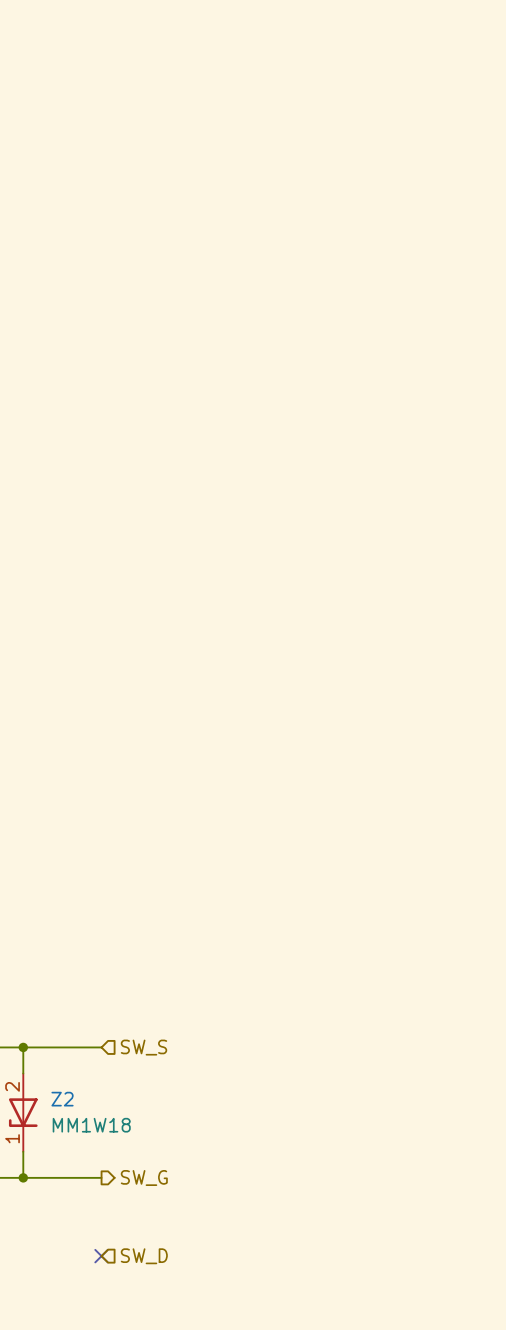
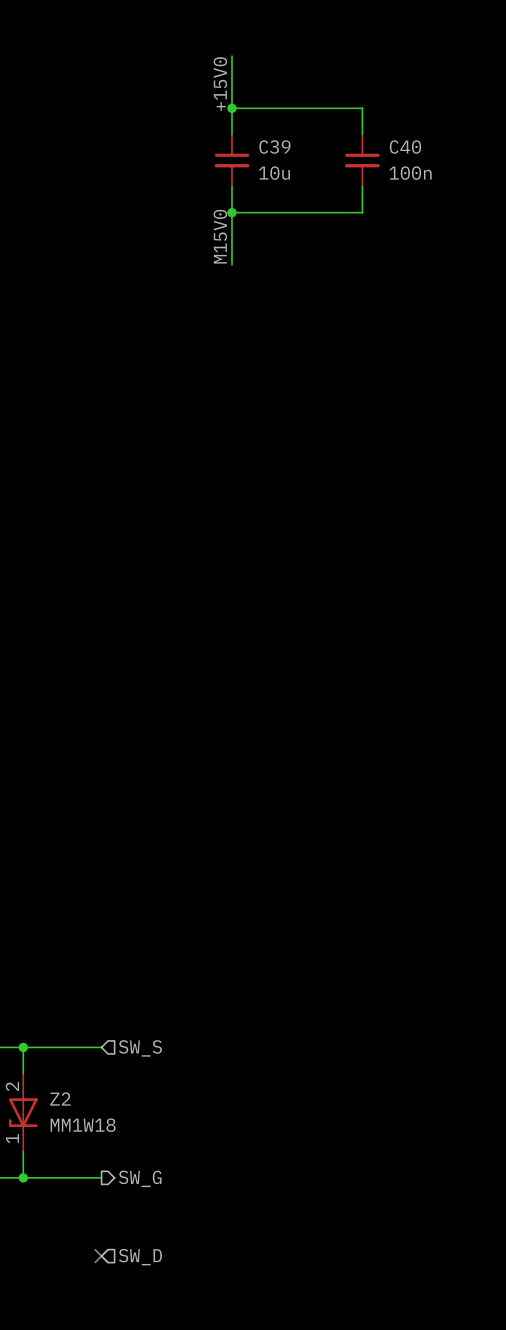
wire: none -> (231, 56) (231, 134)
label: none -> +15V0 (220, 84)
wire: none -> (231, 108) (362, 108) (362, 134)
junction: none -> (231, 108)
C39: none -> 10u (231, 160)
C40: none -> 100n (362, 160)
wire: none -> (231, 186) (231, 264)
wire: none -> (362, 186) (362, 212) (231, 212)
junction: none -> (231, 212)
label: none -> M15V0 (220, 236)

